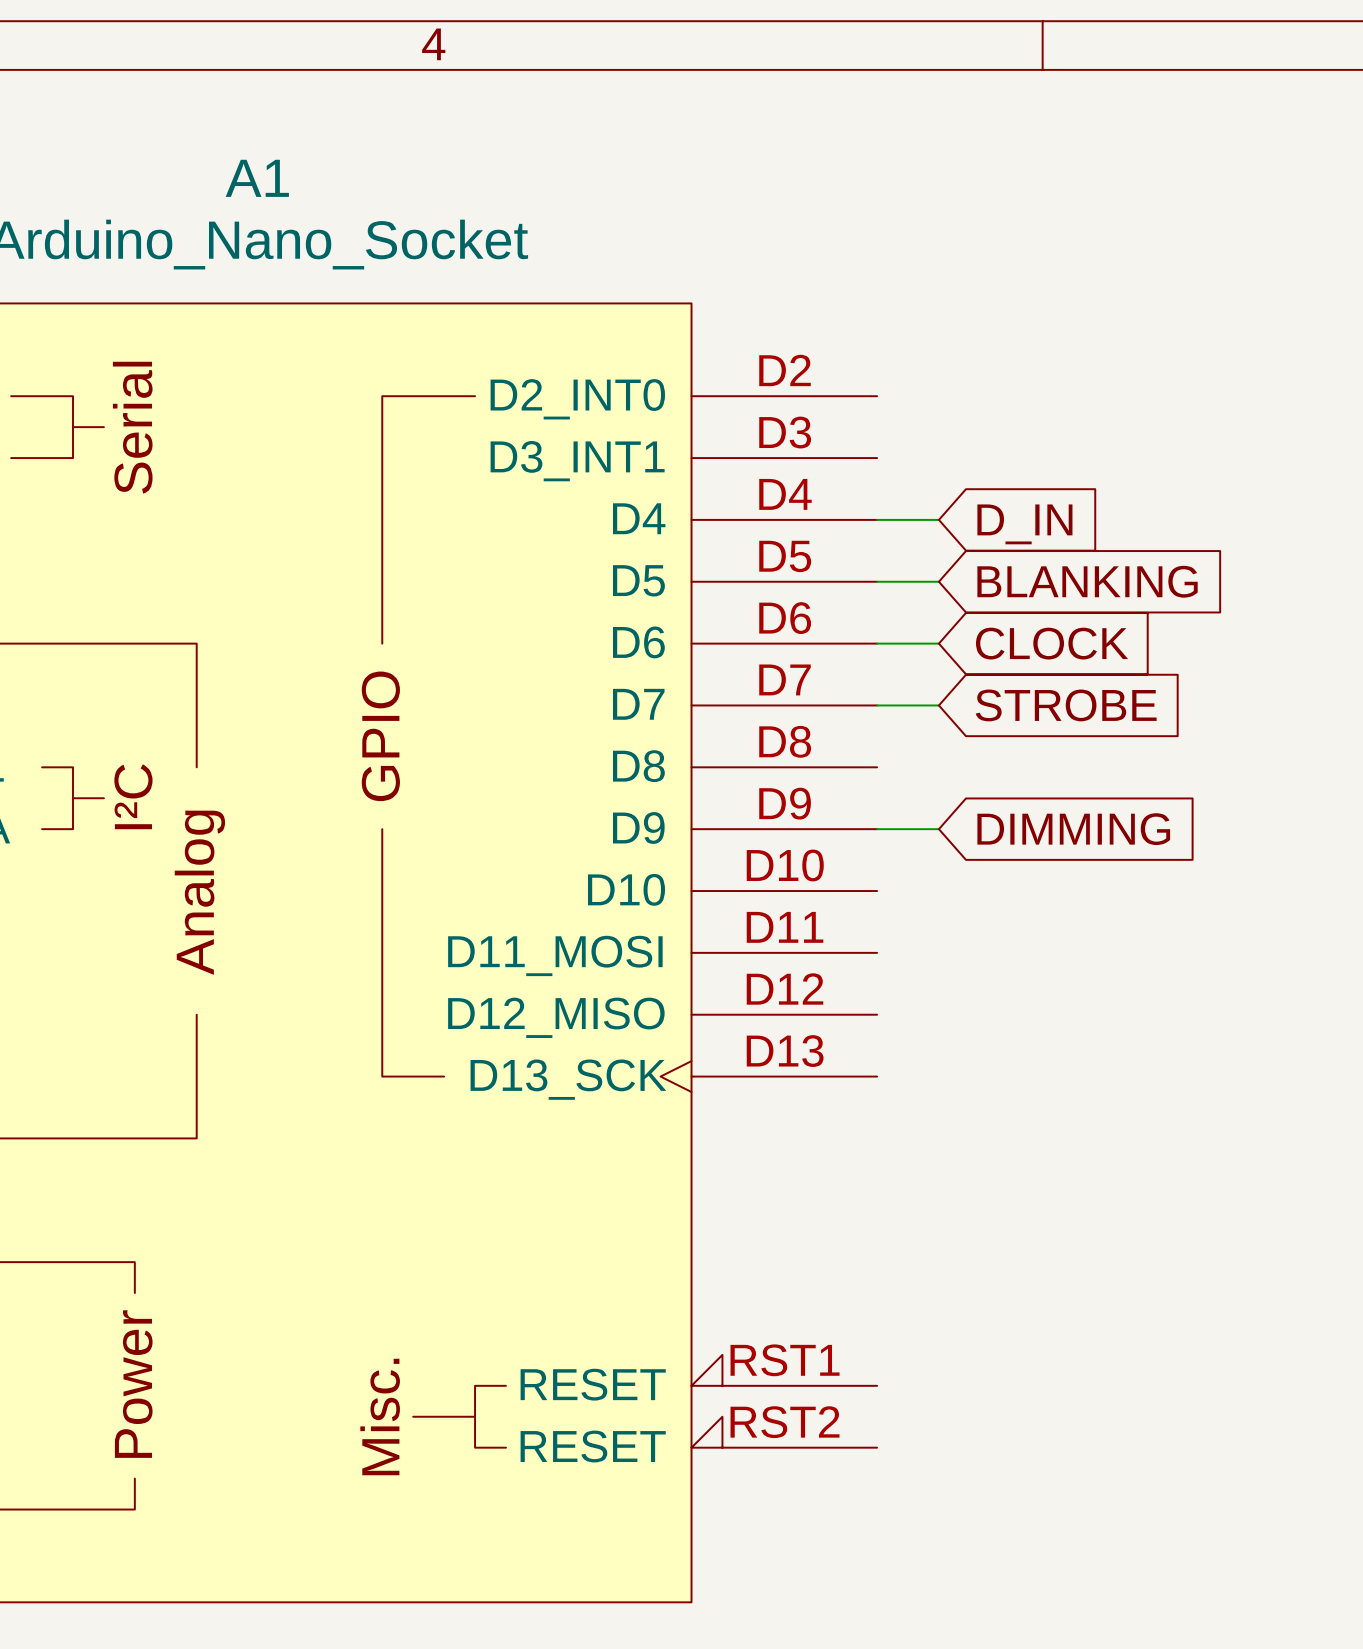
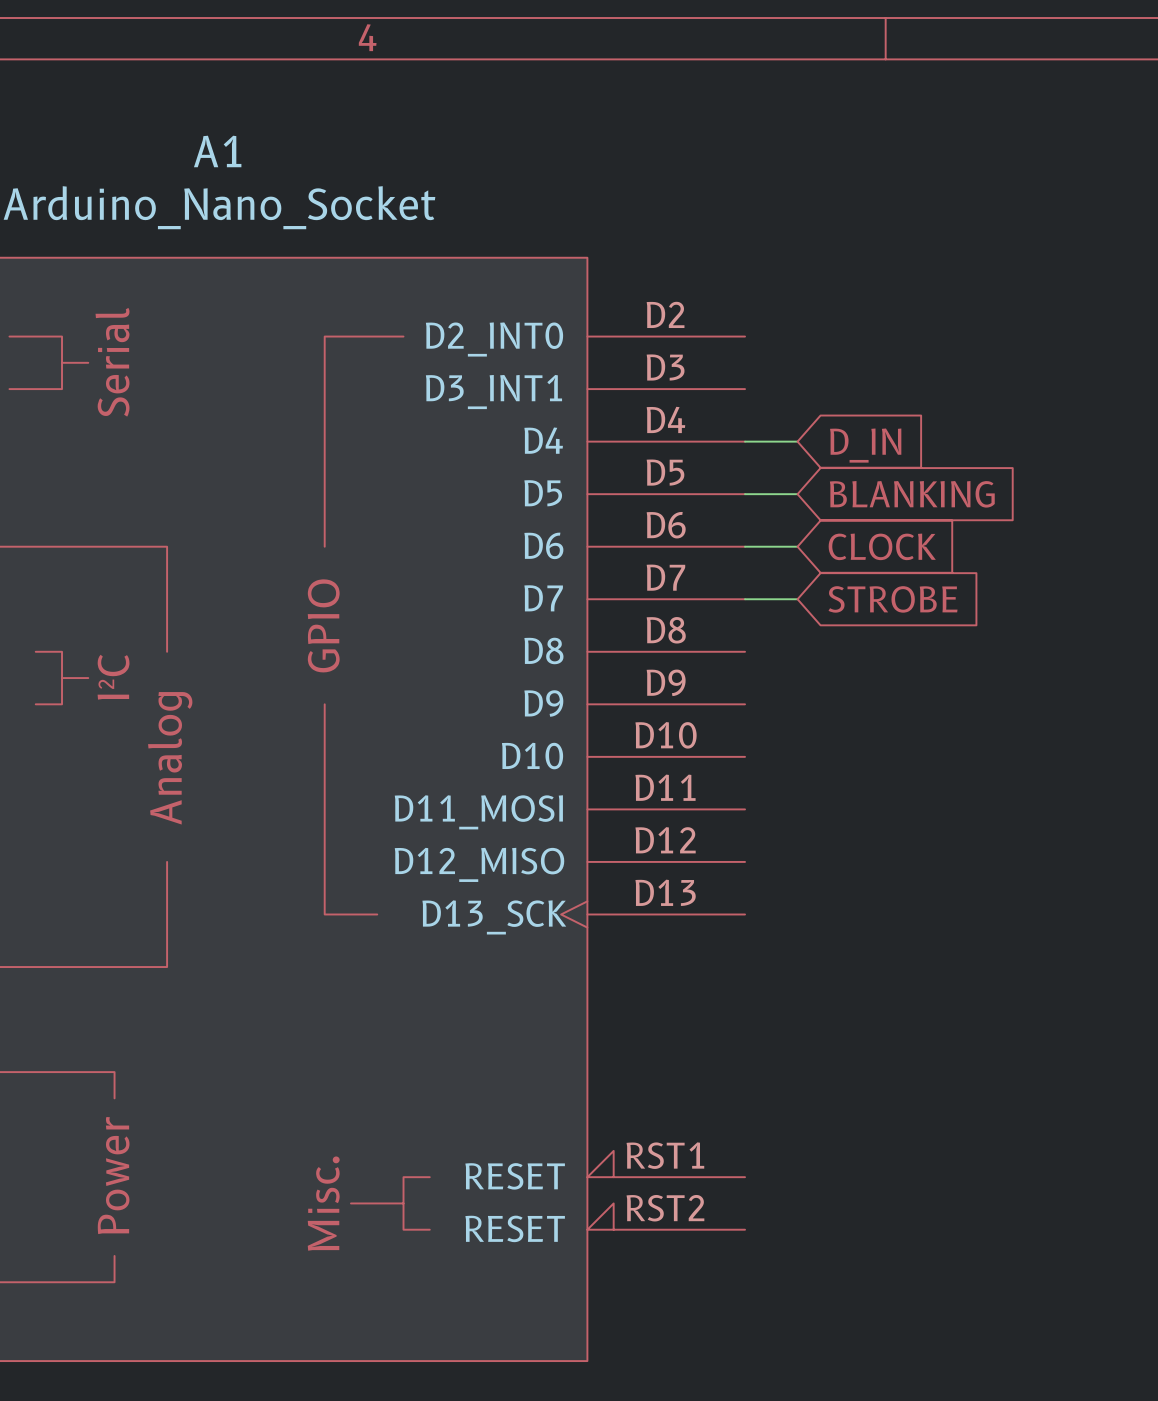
wire: (877, 829) (938, 829) -> none
global label: DIMMING (1073, 829) -> none

